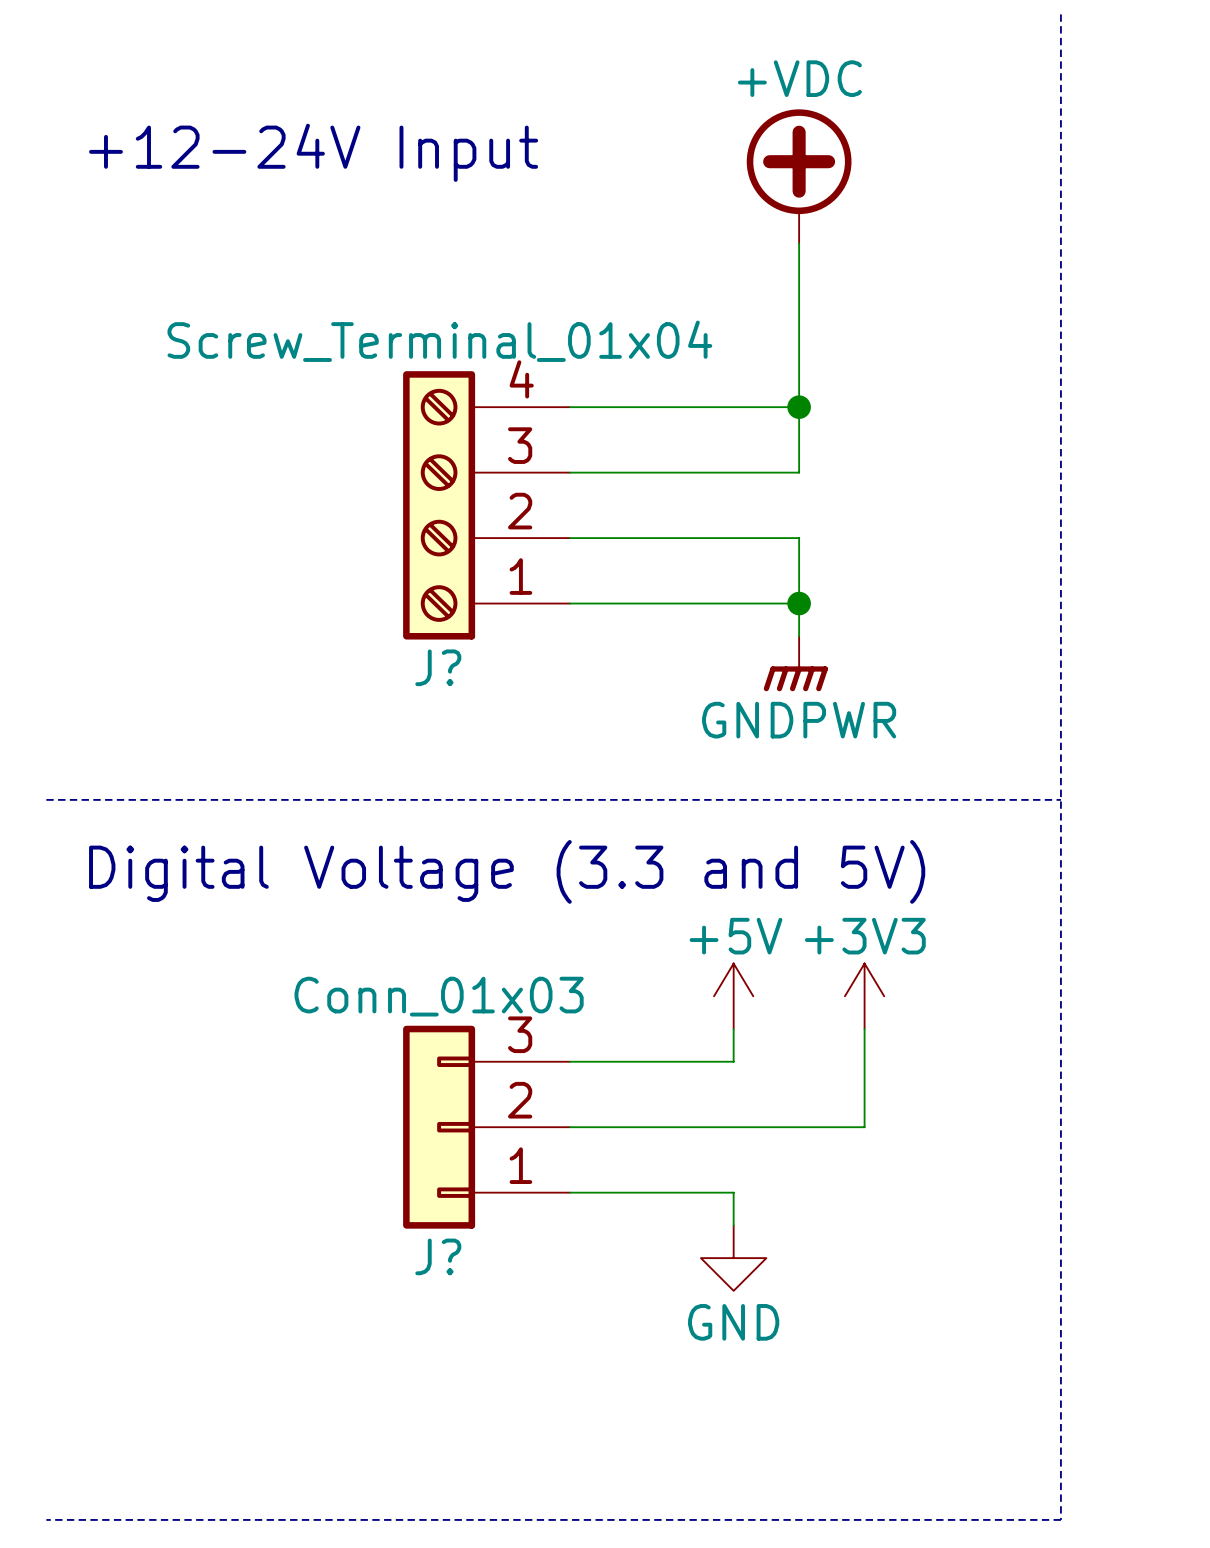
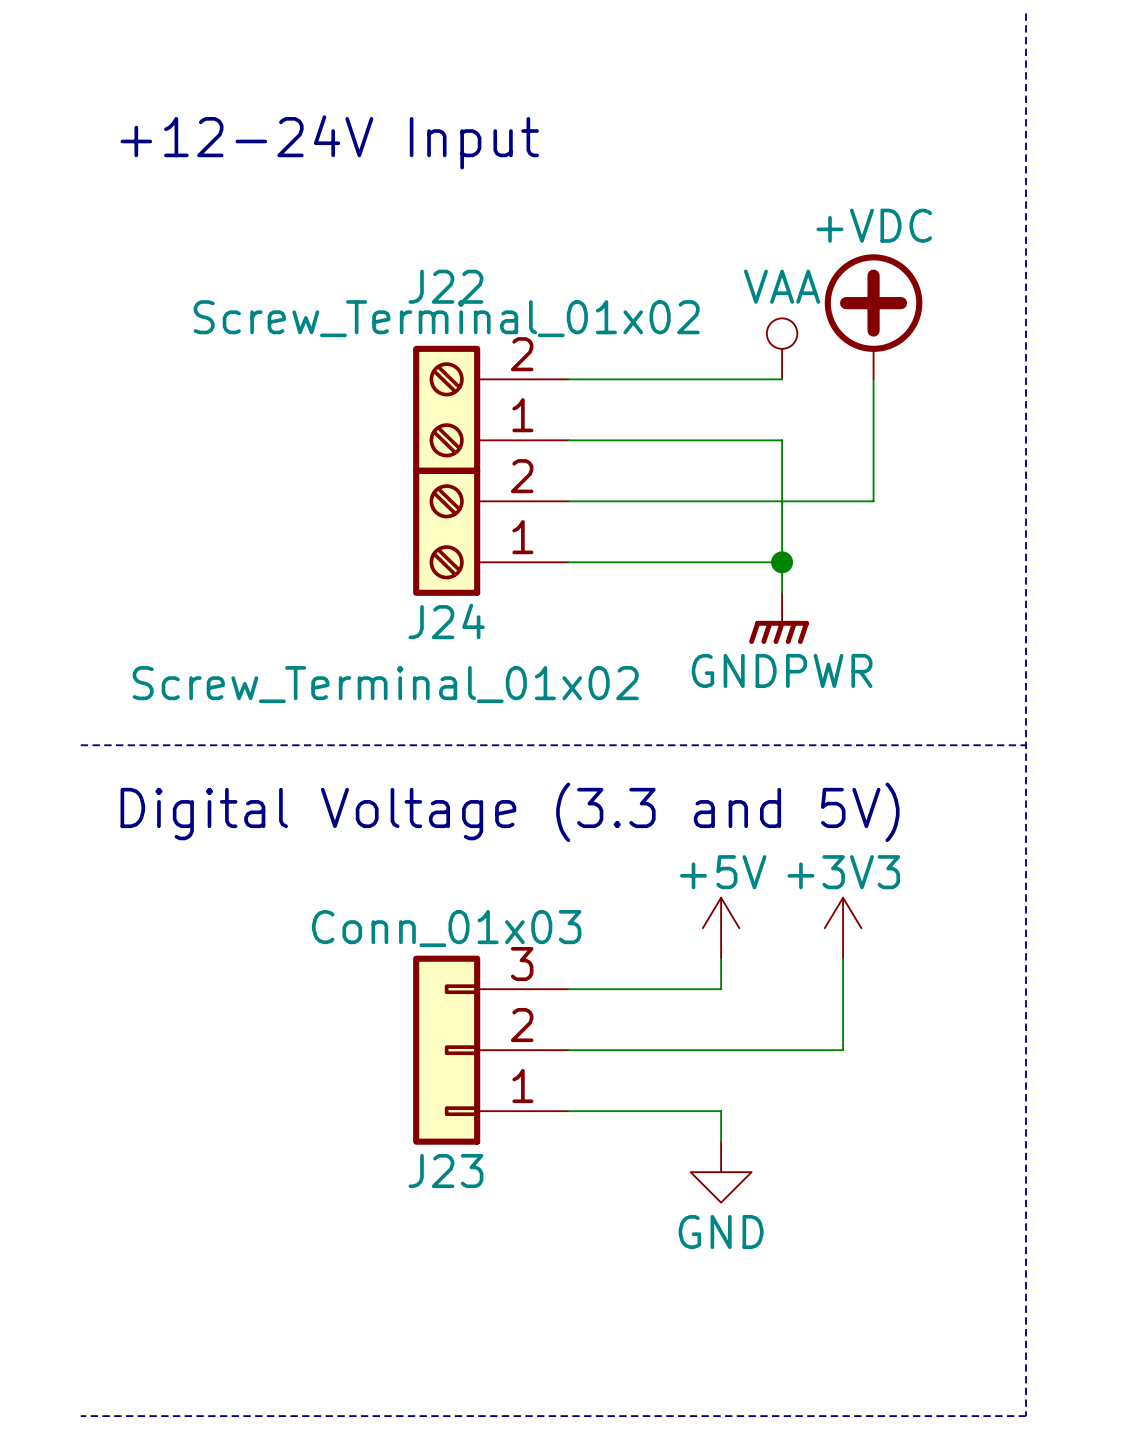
power symbol position: +VDC (799, 176) -> +VDC (873, 316)
wire: (799, 243) (799, 472) -> (873, 379) (873, 501) (782, 501) (782, 440)
power symbol: none -> VAA (782, 348)
junction: (799, 407) -> none
J22: none -> Screw_Terminal_01x02 (490, 409)
J?: Screw_Terminal_01x04 (486, 505) -> none
J24: none -> Screw_Terminal_01x02 (490, 531)
J? name: J? (438, 1256) -> J23 (445, 1171)

